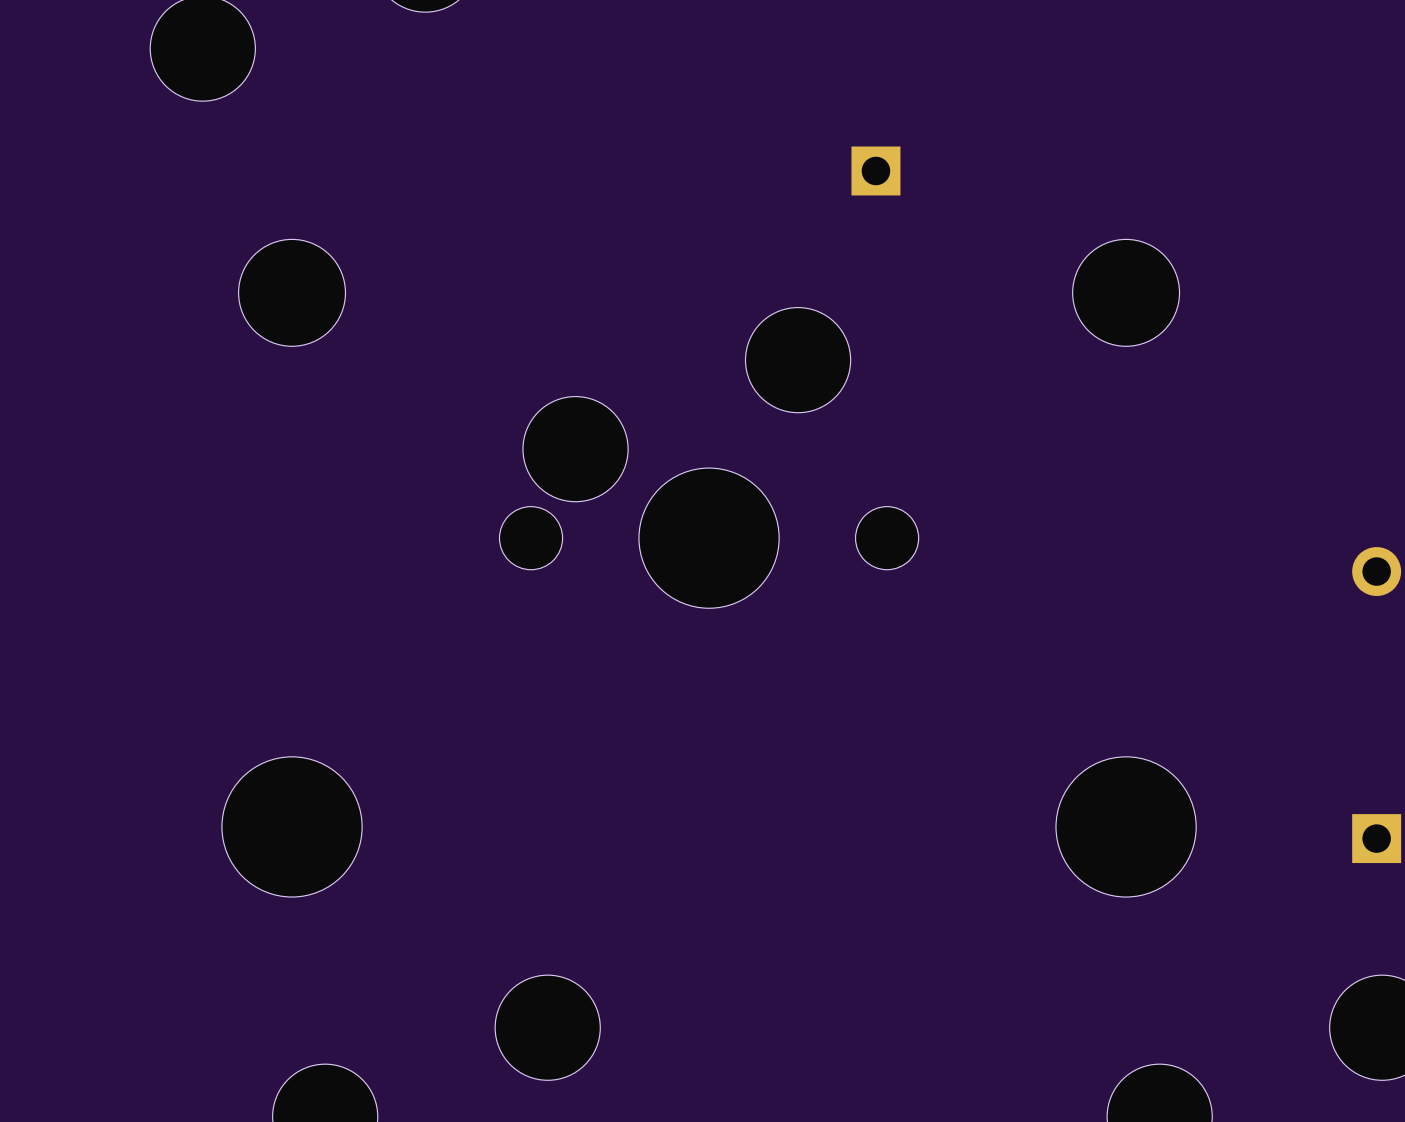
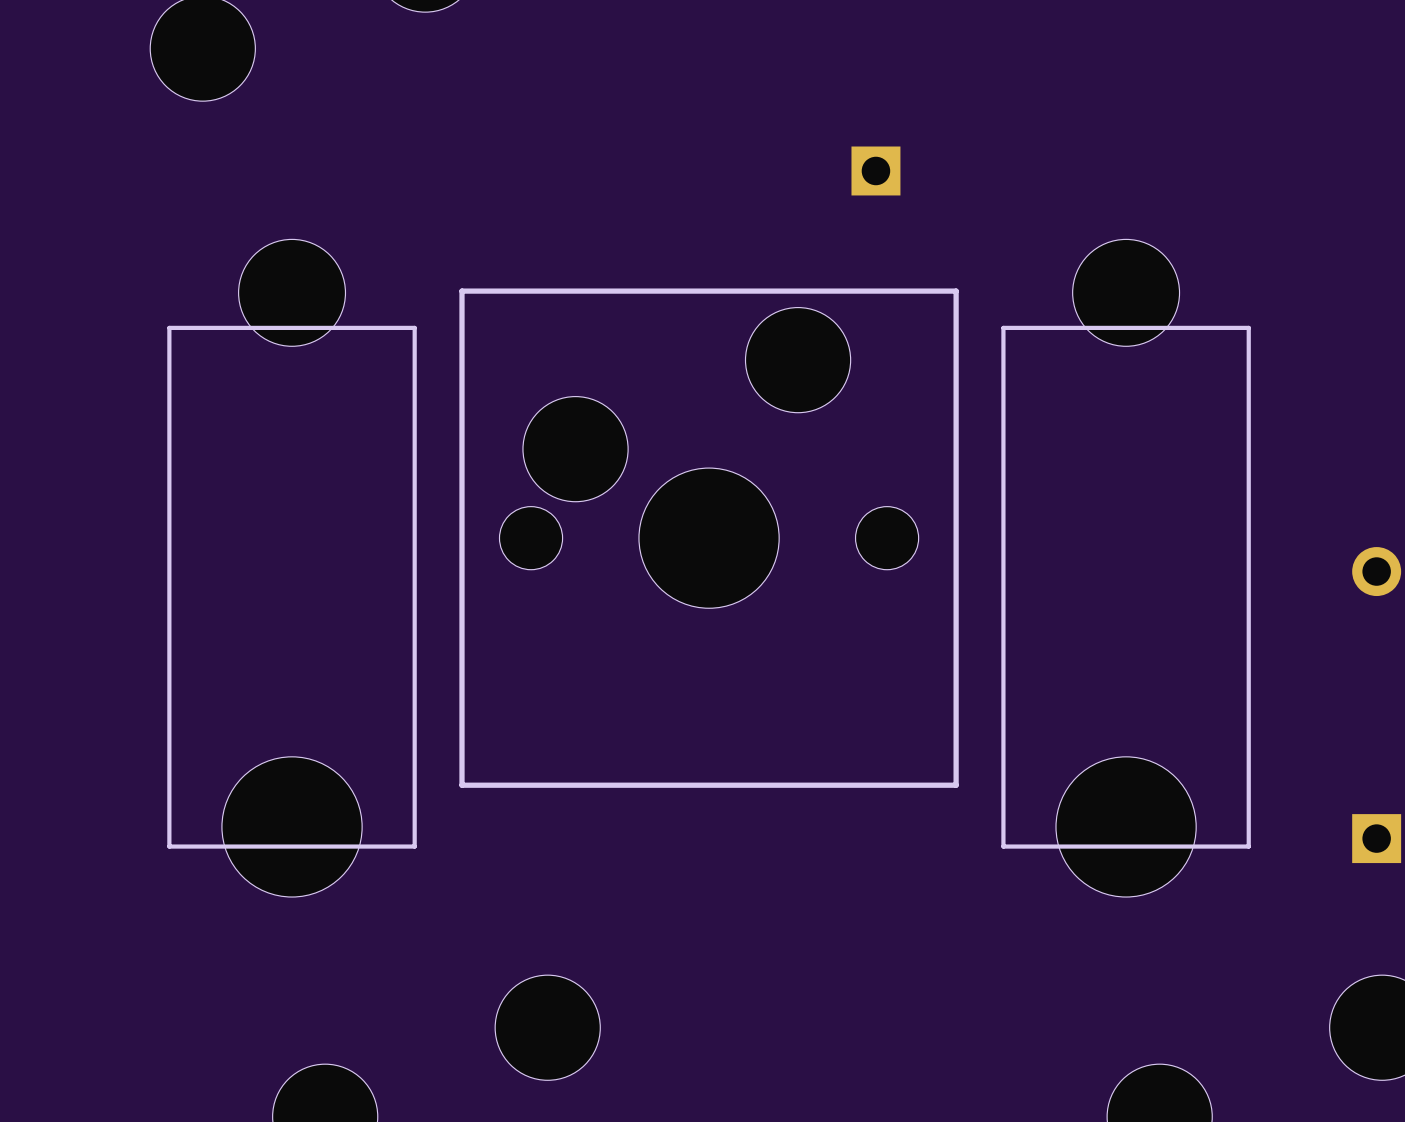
drawing: none -> [167, 288, 1251, 849]

